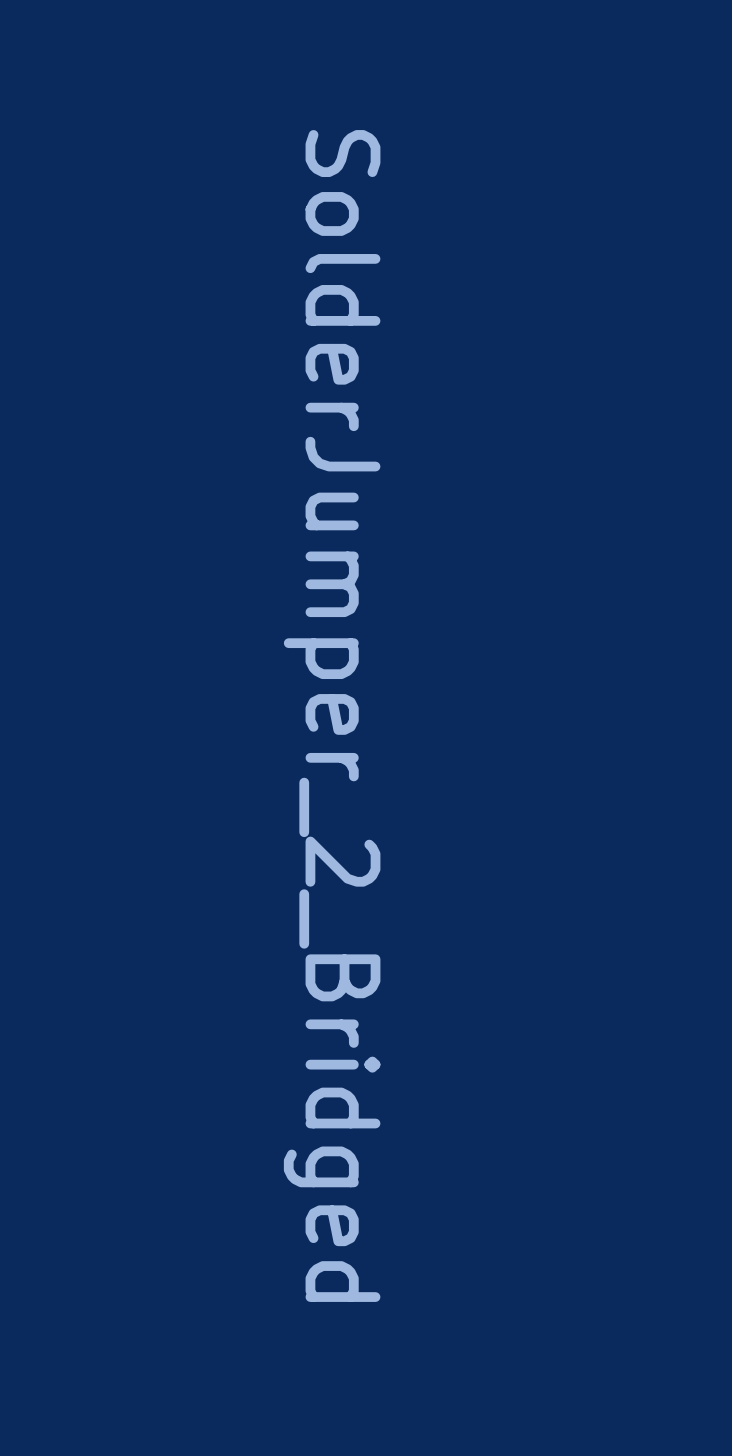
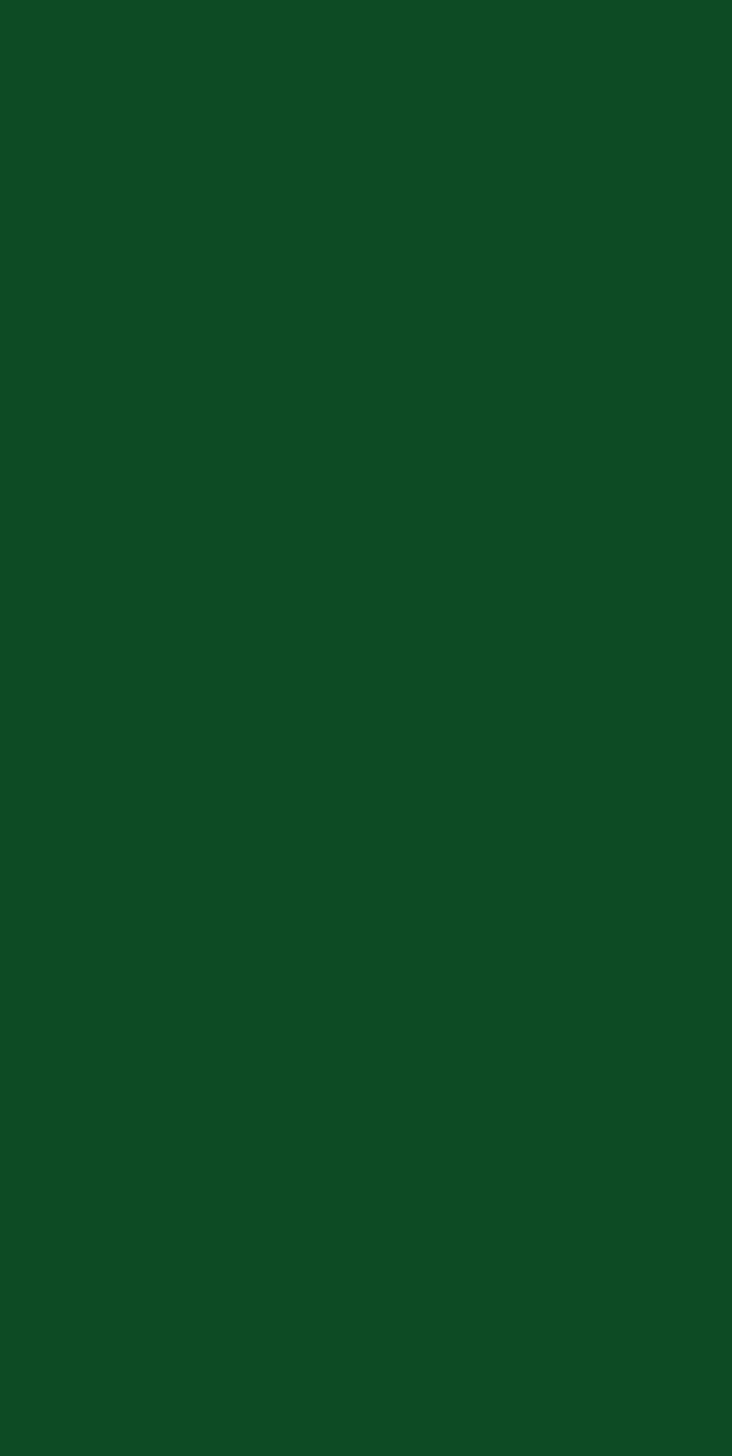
part: SolderJumper_2_Bridged (332, 715) -> none

